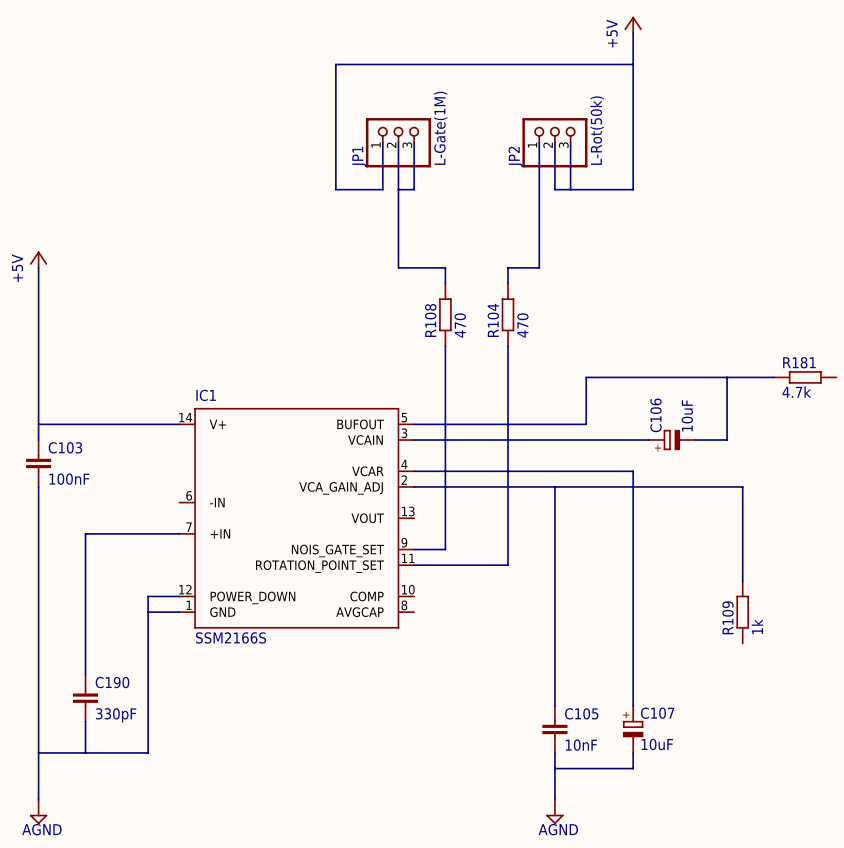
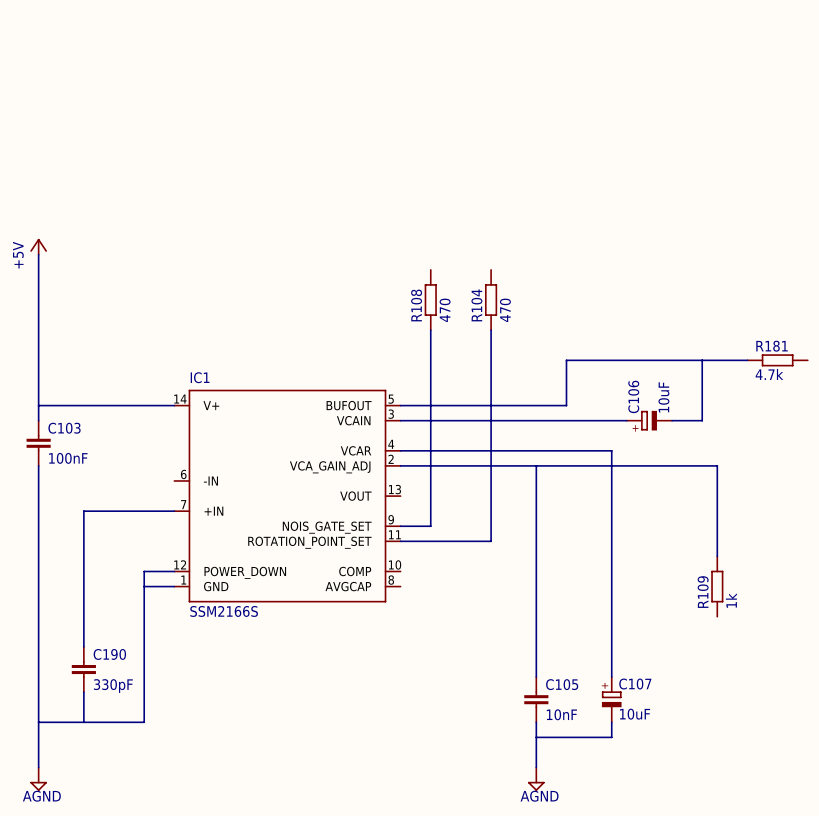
power symbol: +5V (633, 24) -> none
wire: (633, 33) (633, 189) (554, 189) (554, 142) -> none
wire: (633, 64) (335, 64) (335, 189) (382, 189) (382, 142) -> none
wire: (398, 142) (398, 267) (445, 267) (445, 283) -> none
JP1: L-Gate(1M) (398, 142) -> none
wire: (414, 142) (414, 189) (398, 189) -> none
wire: (539, 142) (539, 267) (507, 267) (507, 283) -> none
JP2: L-Rot(50k) (554, 142) -> none
wire: (570, 142) (570, 189) -> none

